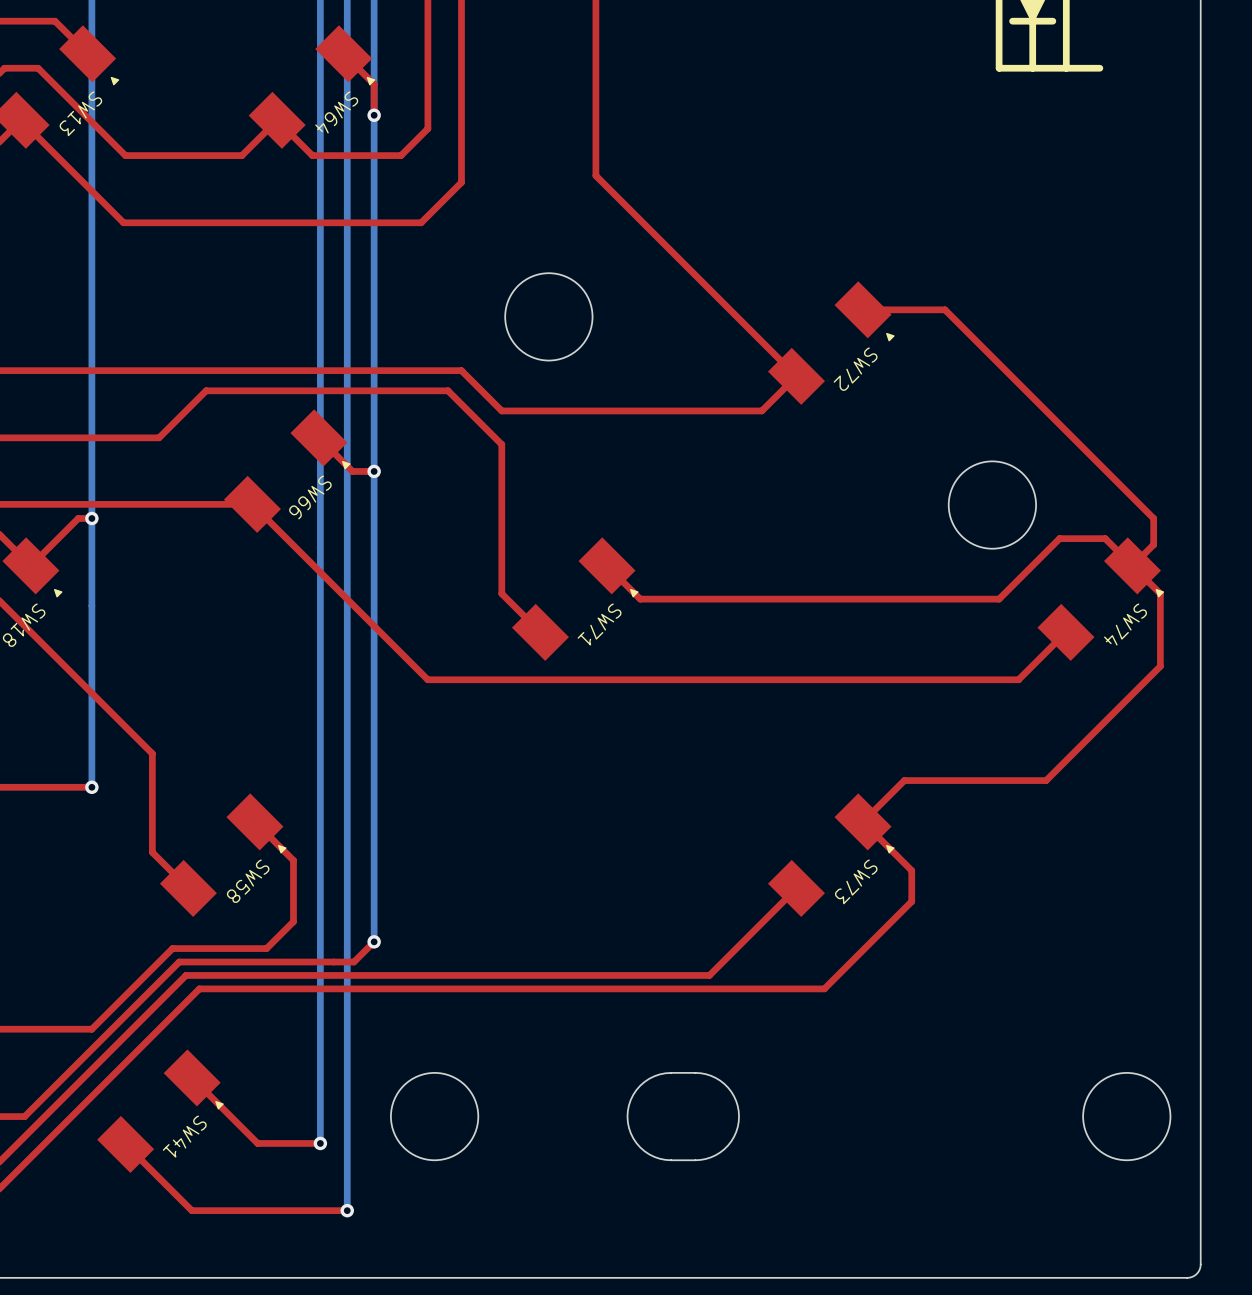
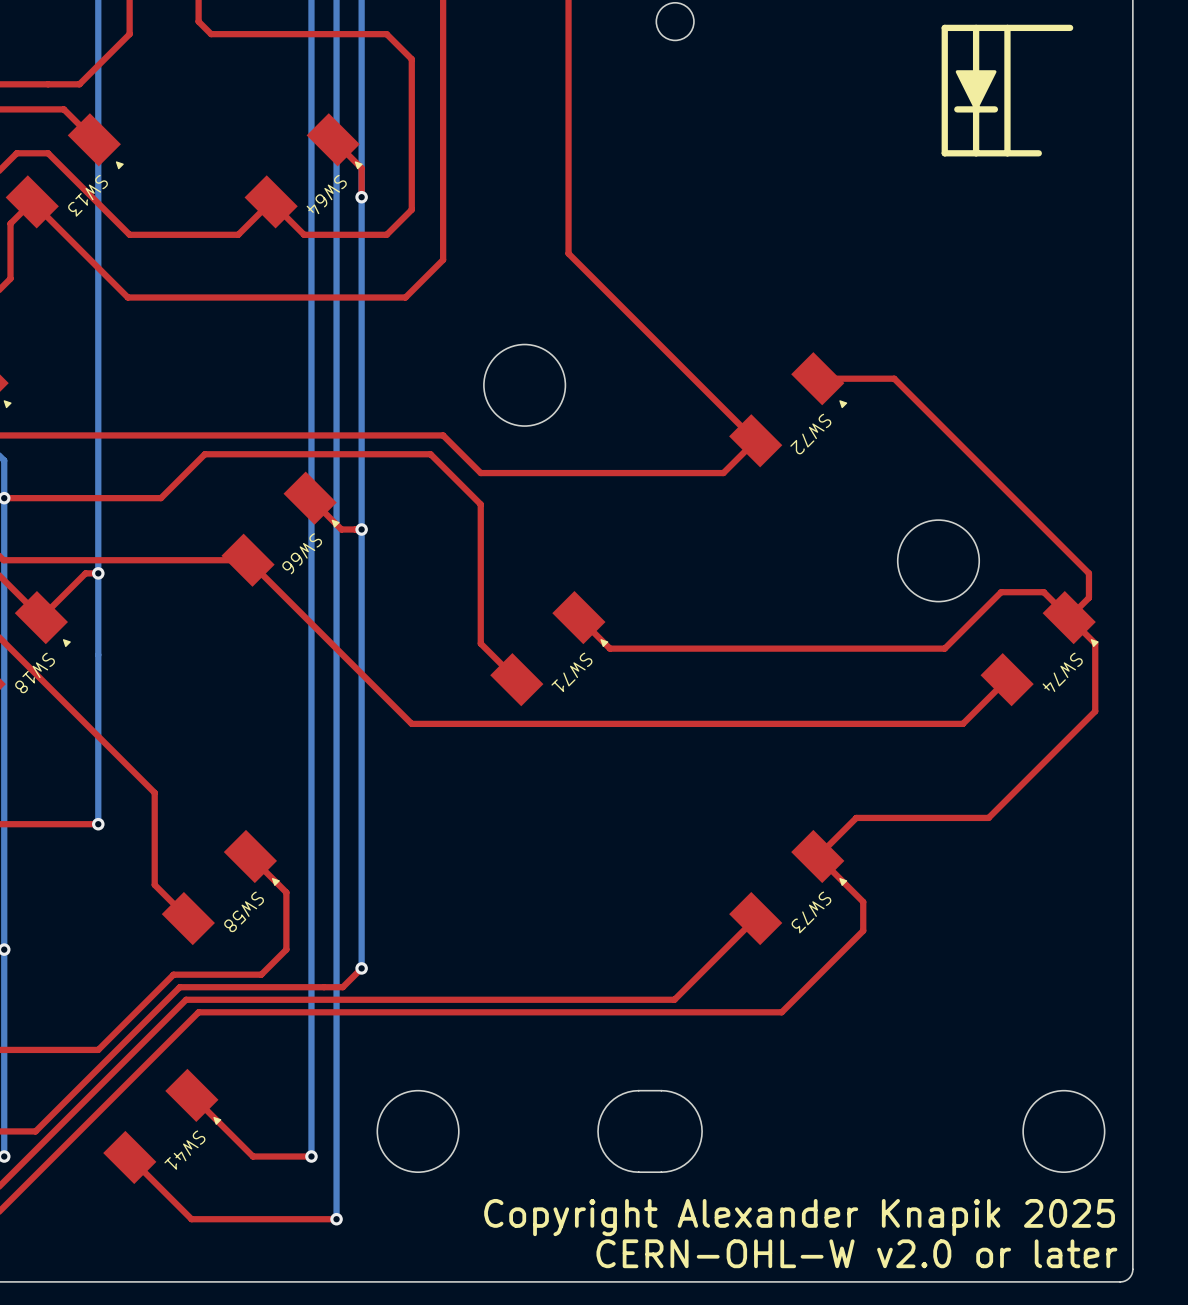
text: none -> Copyright Alexander Knapik 2025 (799, 1217)
text: none -> CERN-OHL-W v2.0 or later (856, 1253)

